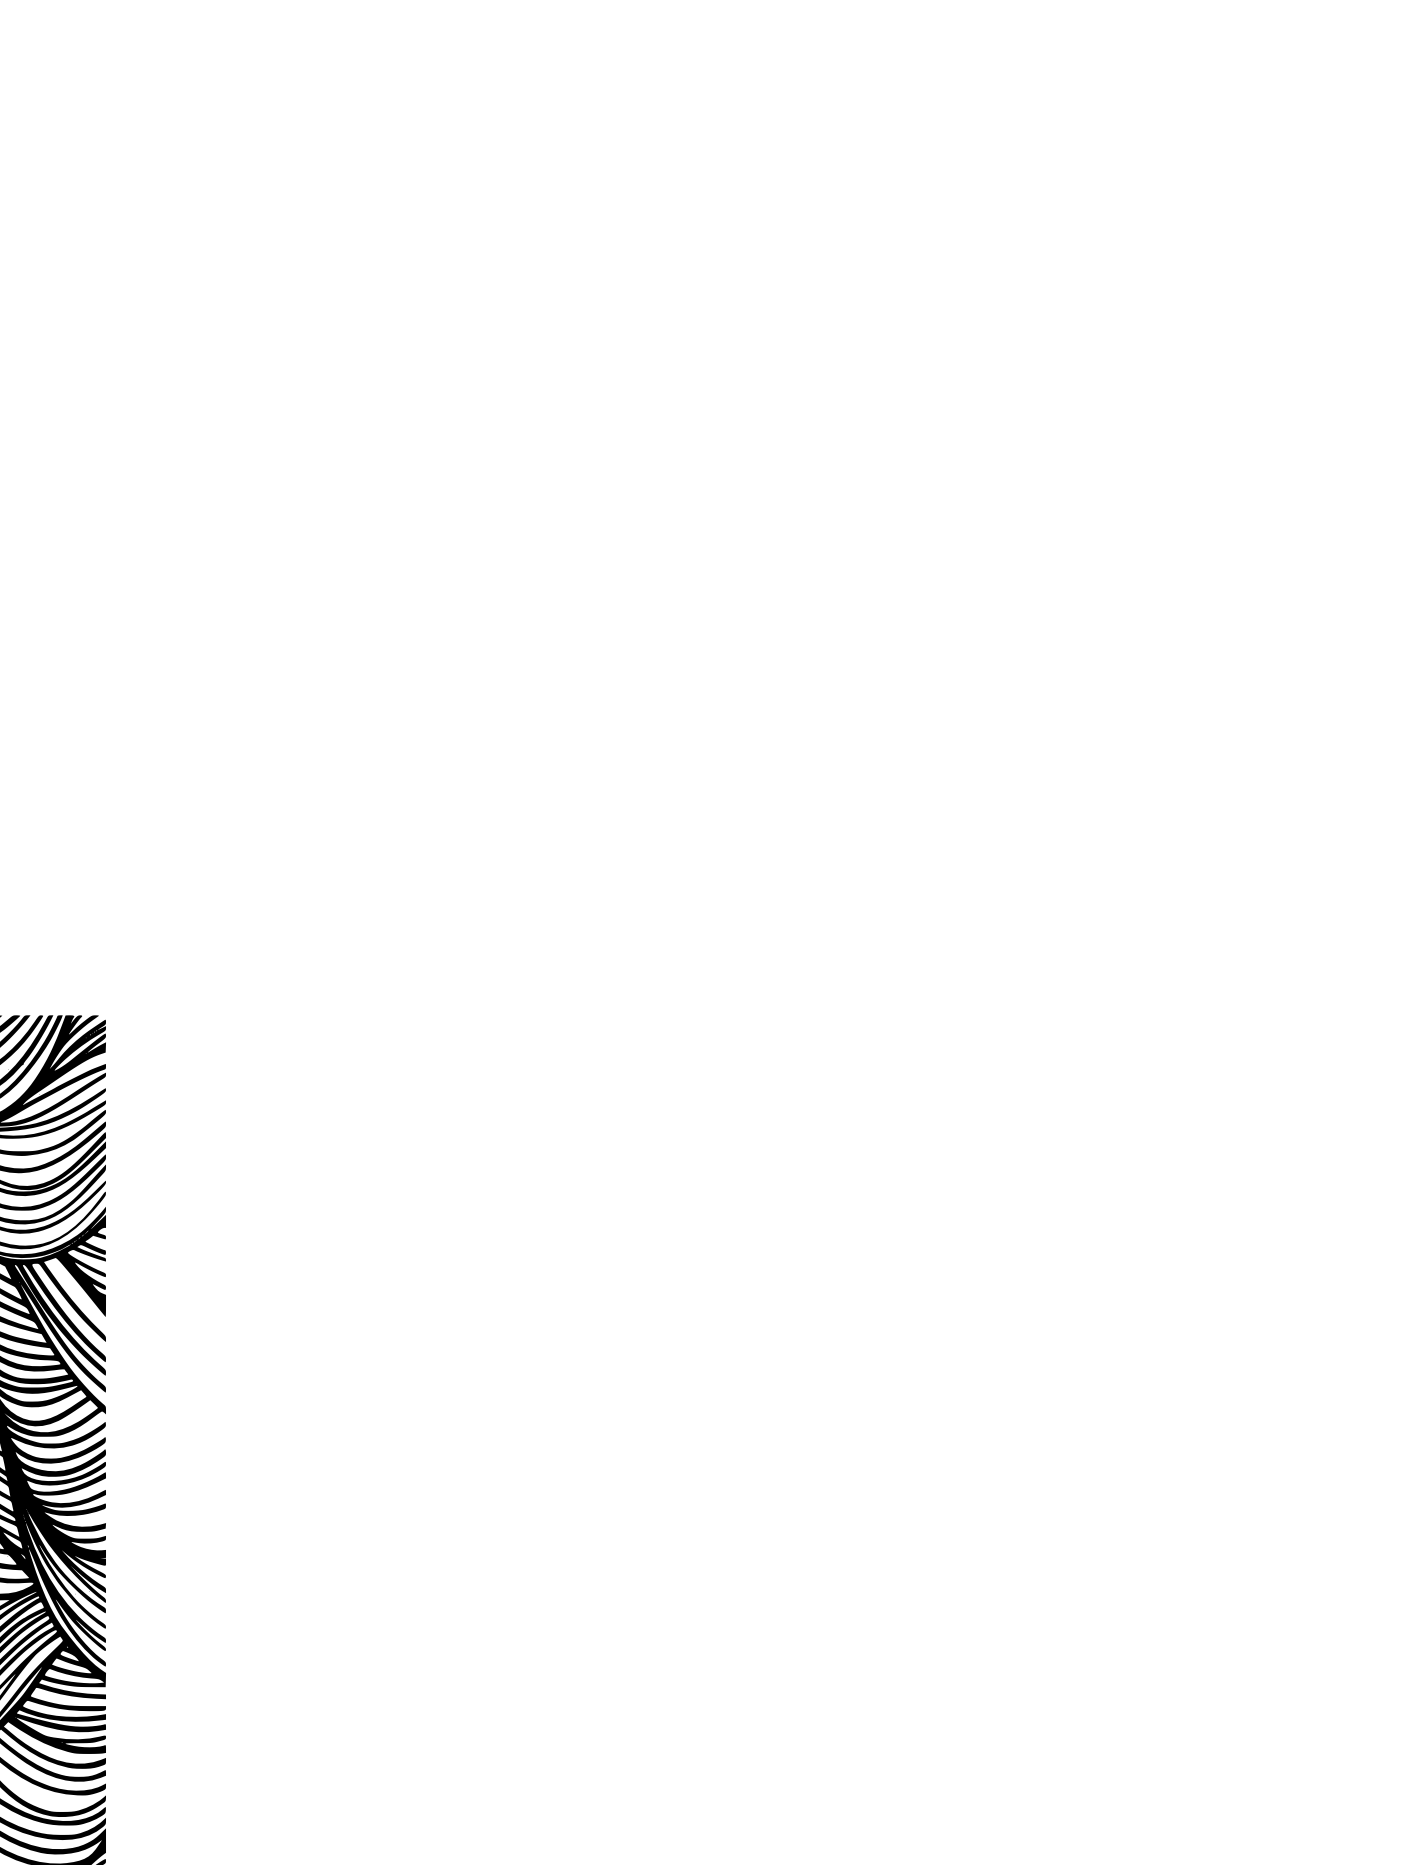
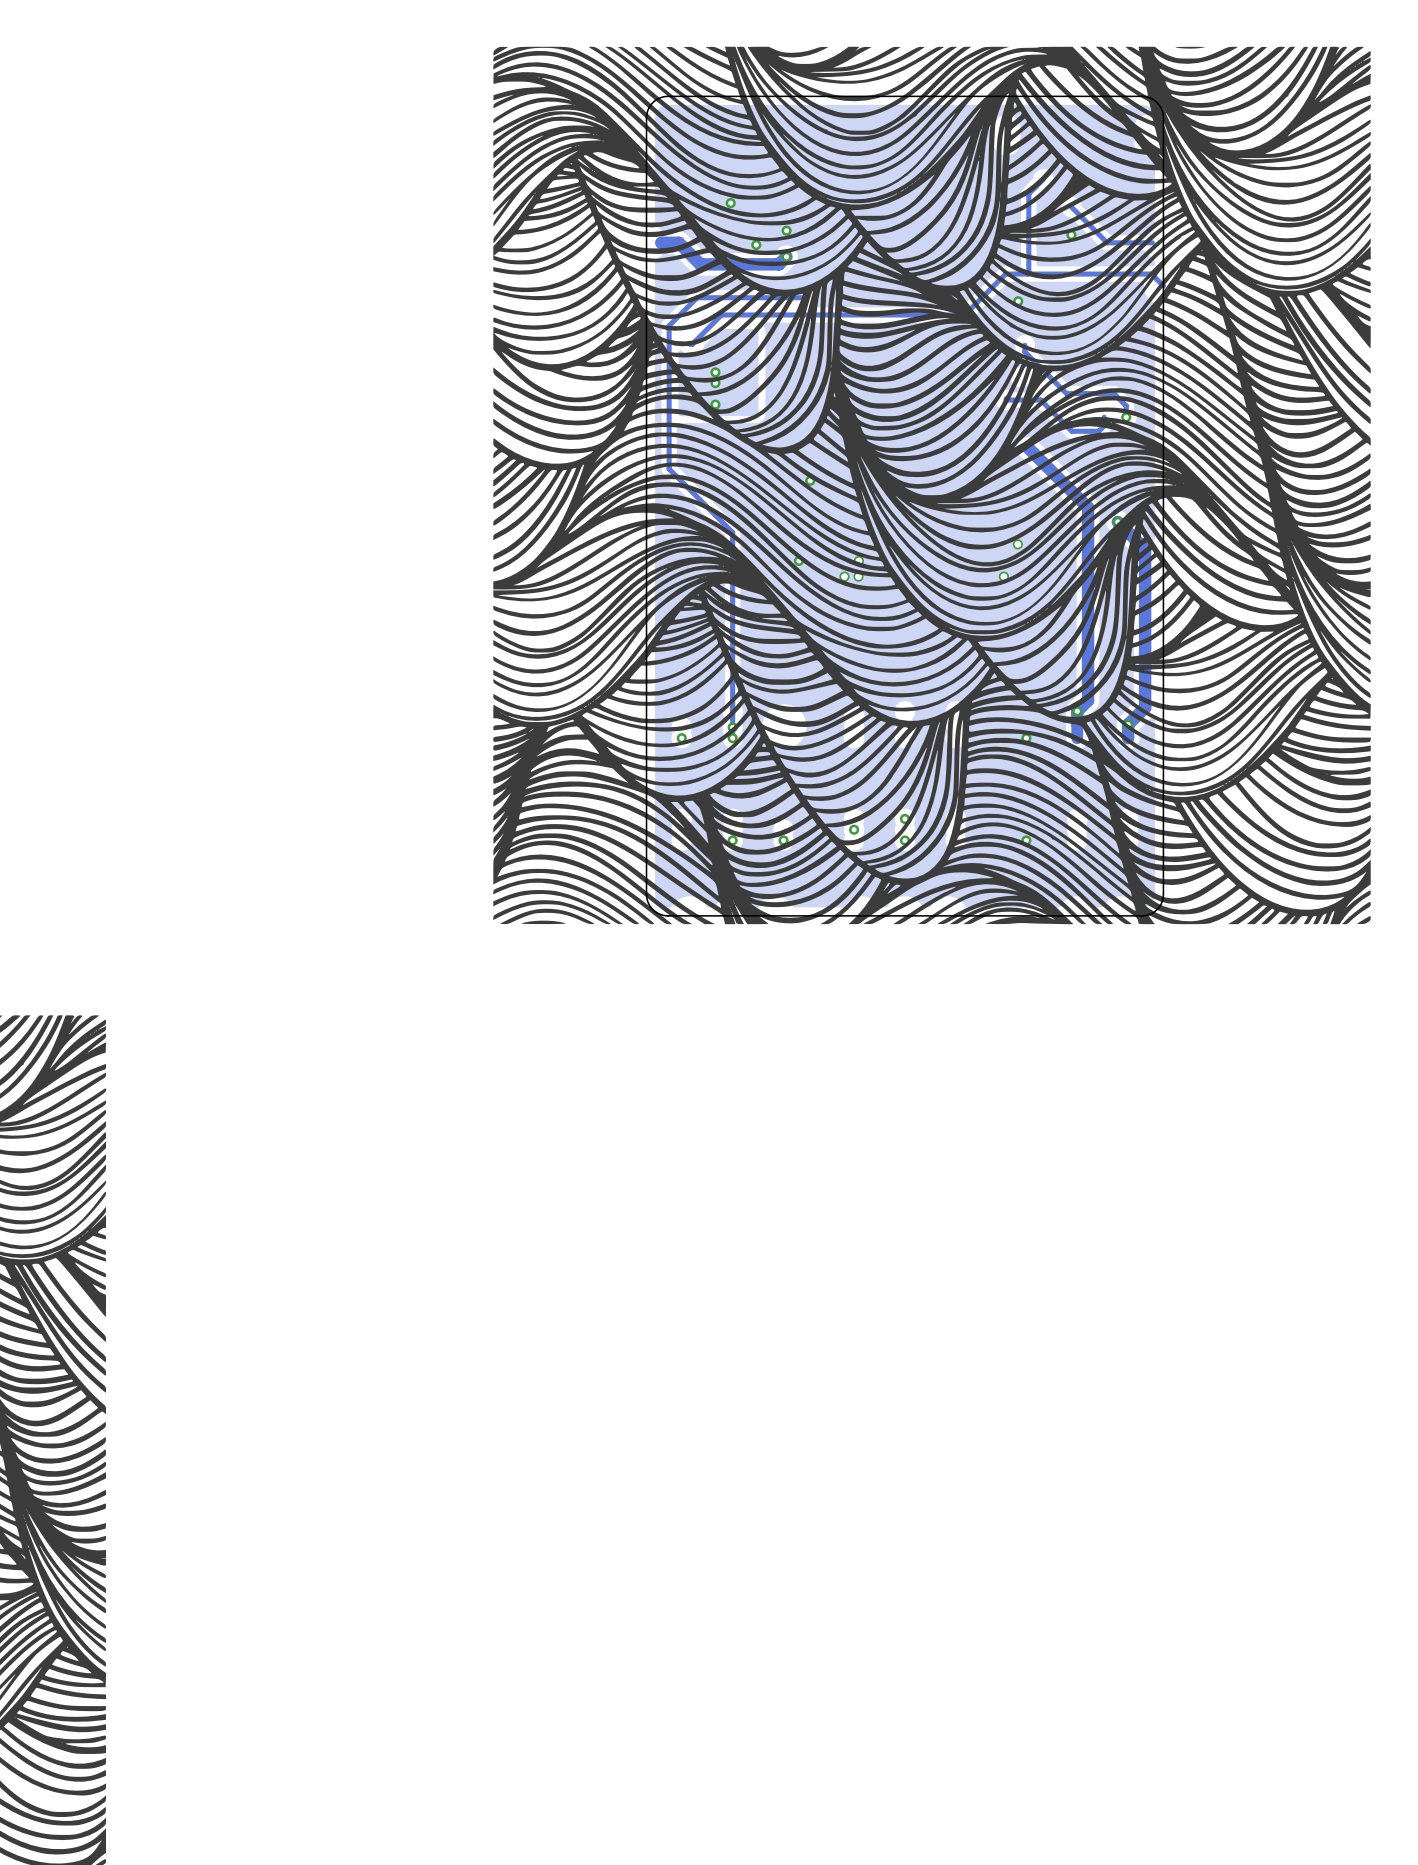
drawing: none -> [493, 46, 1371, 925]
board edge: none -> (1141, 96) (668, 96) (656, 99) (649, 106) (646, 117) (646, 894) (648, 903) (656, 912) (668, 915) (1141, 915) (1151, 913) (1160, 905) (1163, 894) (1163, 117) (1161, 108) (1157, 102) (1151, 98) (1141, 96)
track: none -> (1043, 179) (1028, 193) (1028, 272) (1005, 274) (964, 314) (721, 314) (690, 344)
via: none -> (730, 203)
track: none -> (1071, 207) (1107, 242) (1152, 242)
via: none -> (786, 230)
via: none -> (1071, 235)
track: none -> (661, 242) (678, 242) (700, 264) (778, 264) (786, 256)
via: none -> (756, 244)
via: none -> (786, 256)
track: none -> (1029, 274) (1151, 274) (1163, 285)
track: none -> (805, 297) (697, 297) (669, 325) (669, 468) (732, 532) (732, 738)
via: none -> (1018, 301)
track: none -> (1024, 345) (1024, 351) (1066, 393) (1113, 393) (1126, 405) (1126, 417)
via: none -> (715, 372)
via: none -> (715, 383)
track: none -> (1006, 398) (1040, 400) (1071, 431) (1098, 431) (1104, 425) (1104, 417)
via: none -> (715, 404)
via: none -> (1126, 417)
track: none -> (1028, 448) (1088, 507) (1088, 700) (1077, 711) (1077, 738)
via: none -> (810, 480)
track: none -> (1117, 521) (1145, 549) (1145, 707) (1128, 724) (1128, 738)
via: none -> (1117, 521)
via: none -> (1017, 544)
via: none -> (799, 560)
via: none -> (858, 560)
via: none -> (844, 576)
via: none -> (858, 576)
via: none -> (1003, 576)
via: none -> (1077, 711)
via: none -> (1128, 724)
via: none -> (732, 727)
via: none -> (681, 738)
via: none -> (732, 738)
via: none -> (1026, 738)
via: none -> (904, 818)
via: none -> (854, 829)
via: none -> (732, 840)
via: none -> (783, 840)
via: none -> (904, 840)
via: none -> (1026, 840)

